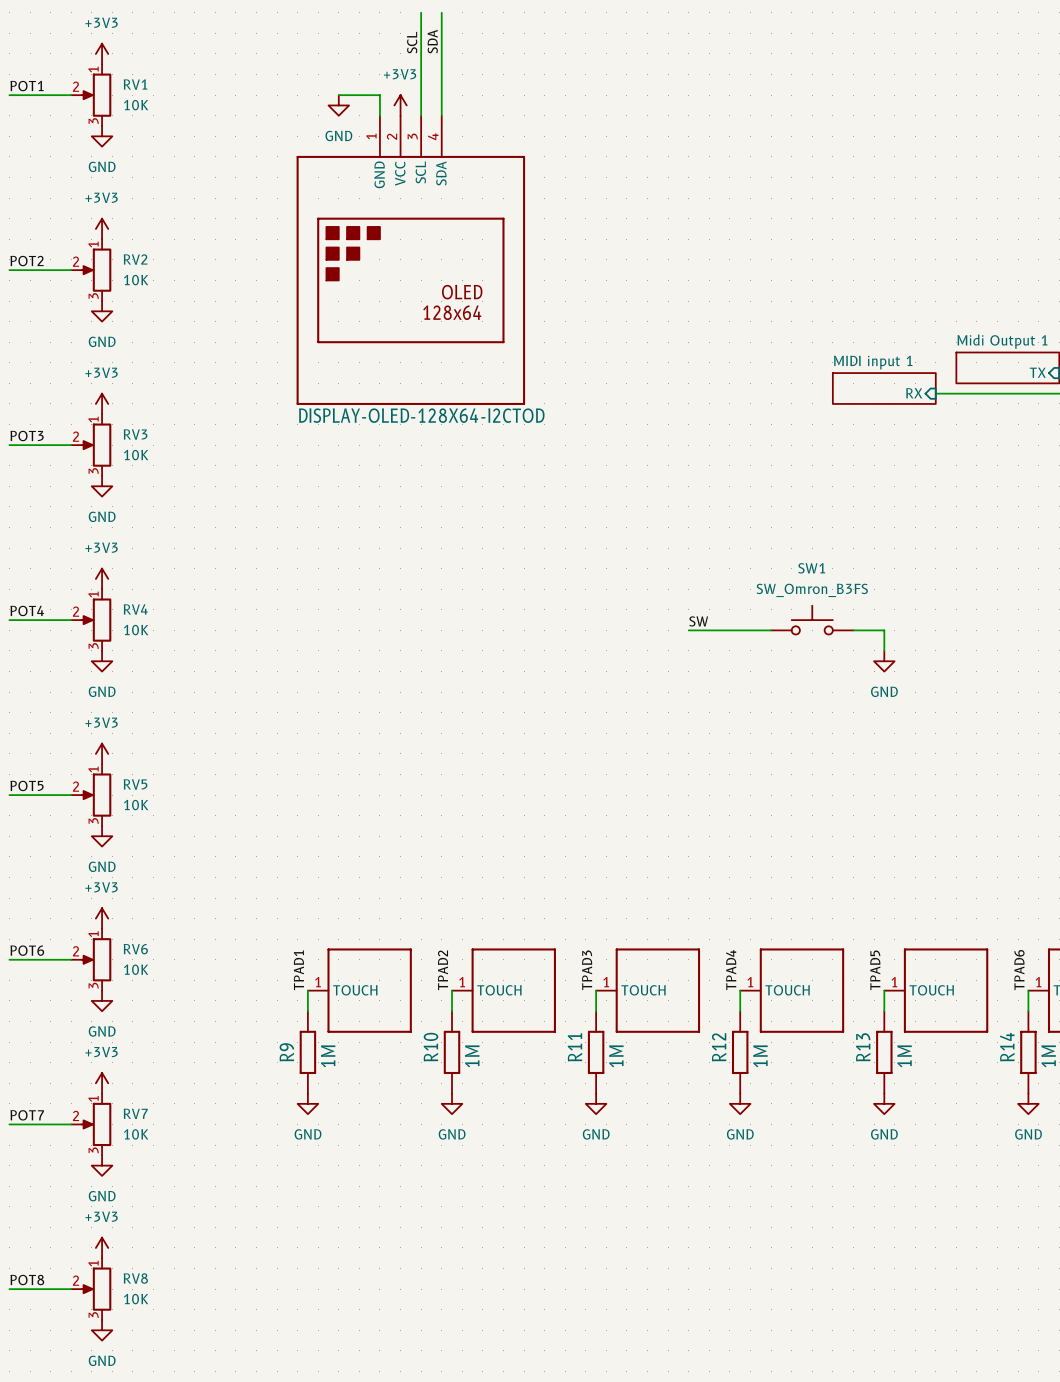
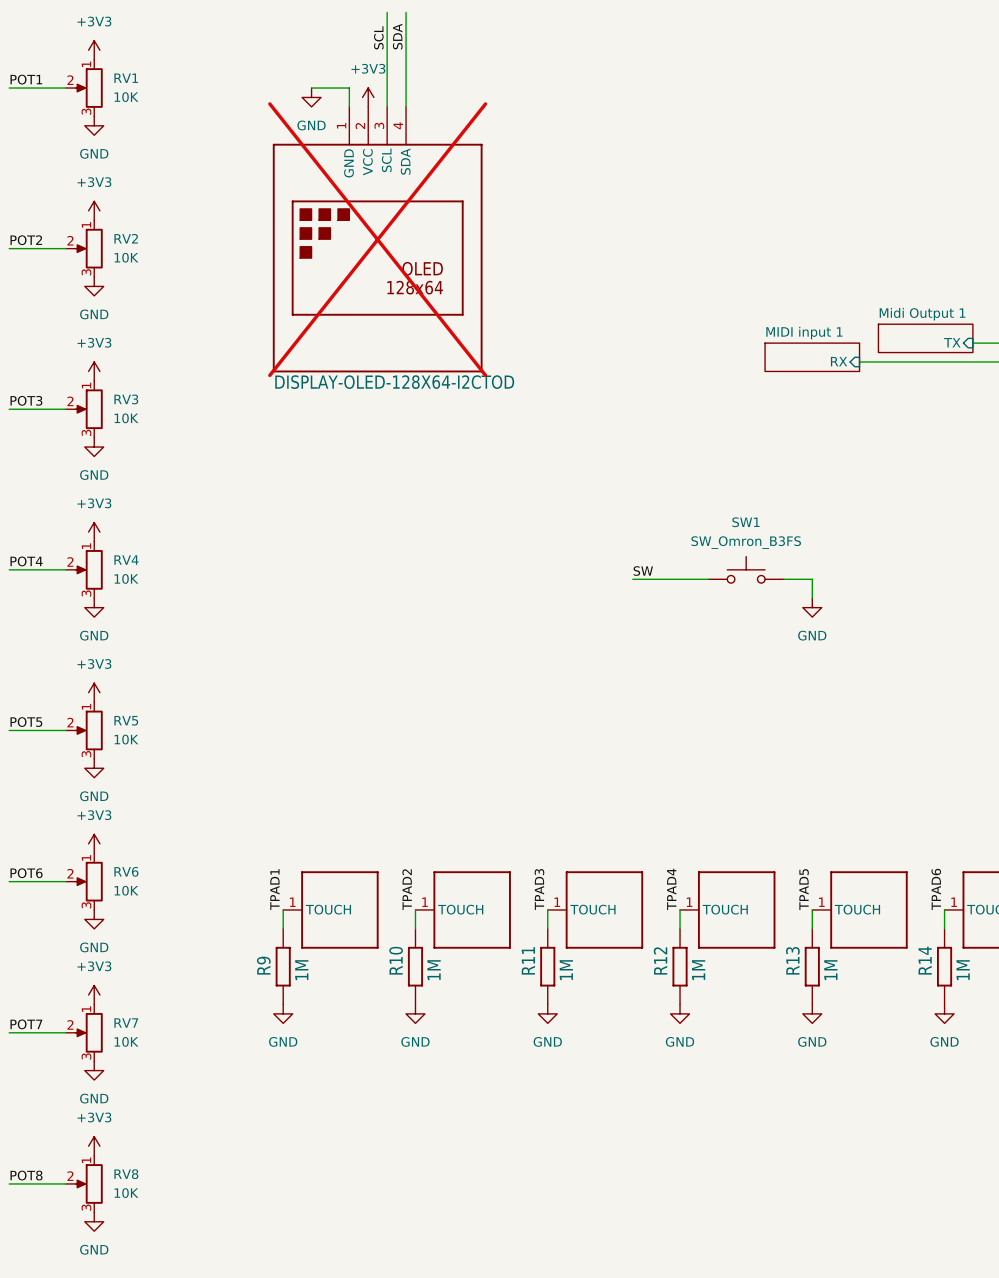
part do-not-place cross: none -> (377, 239)

